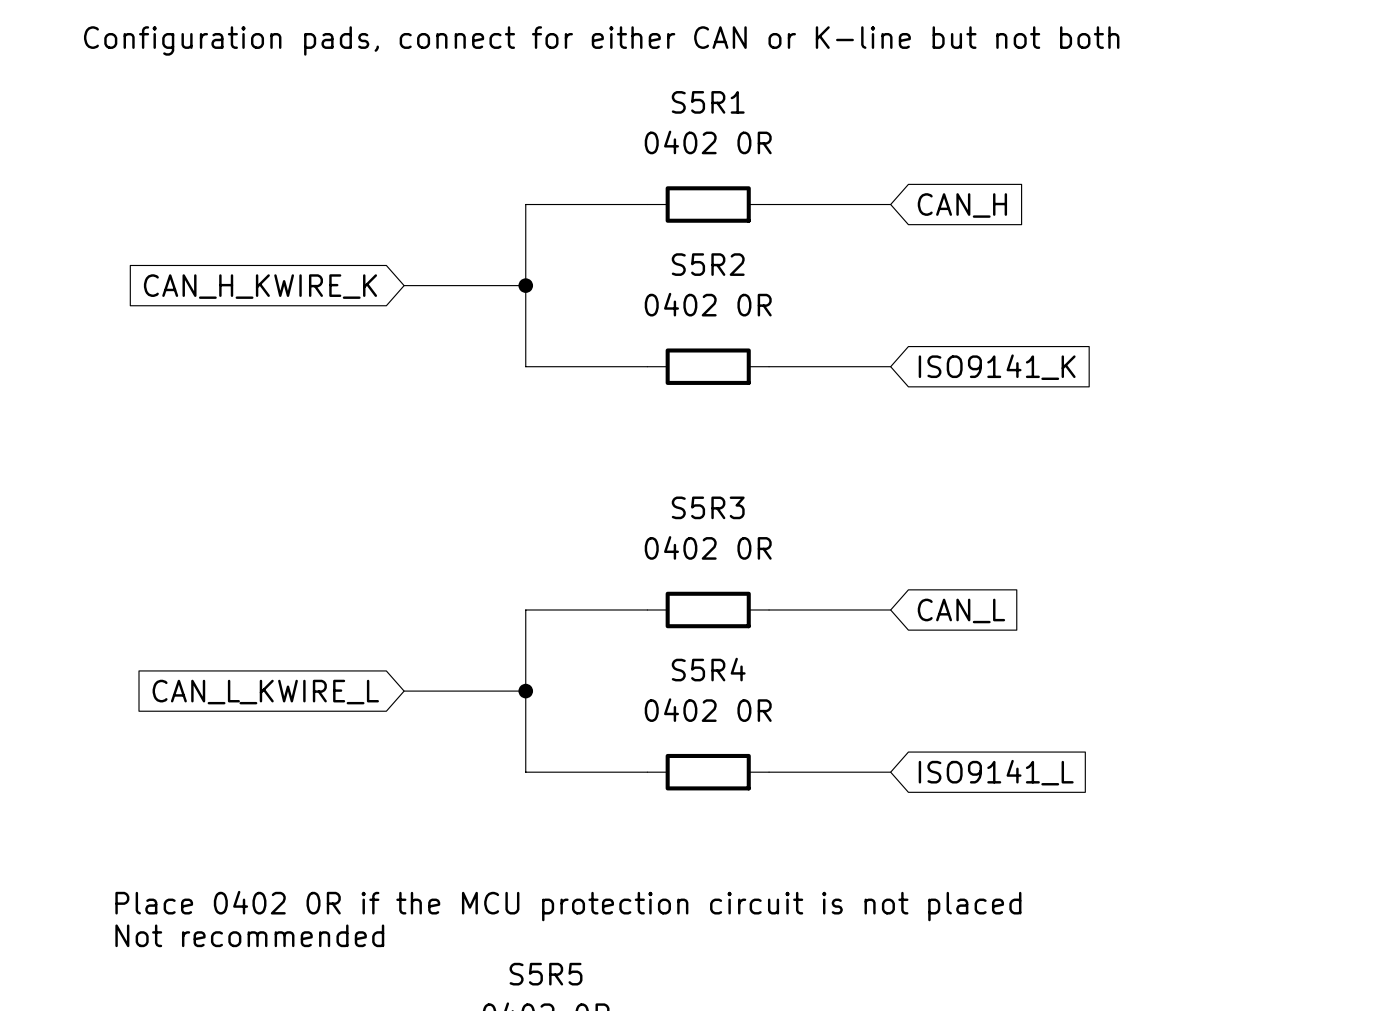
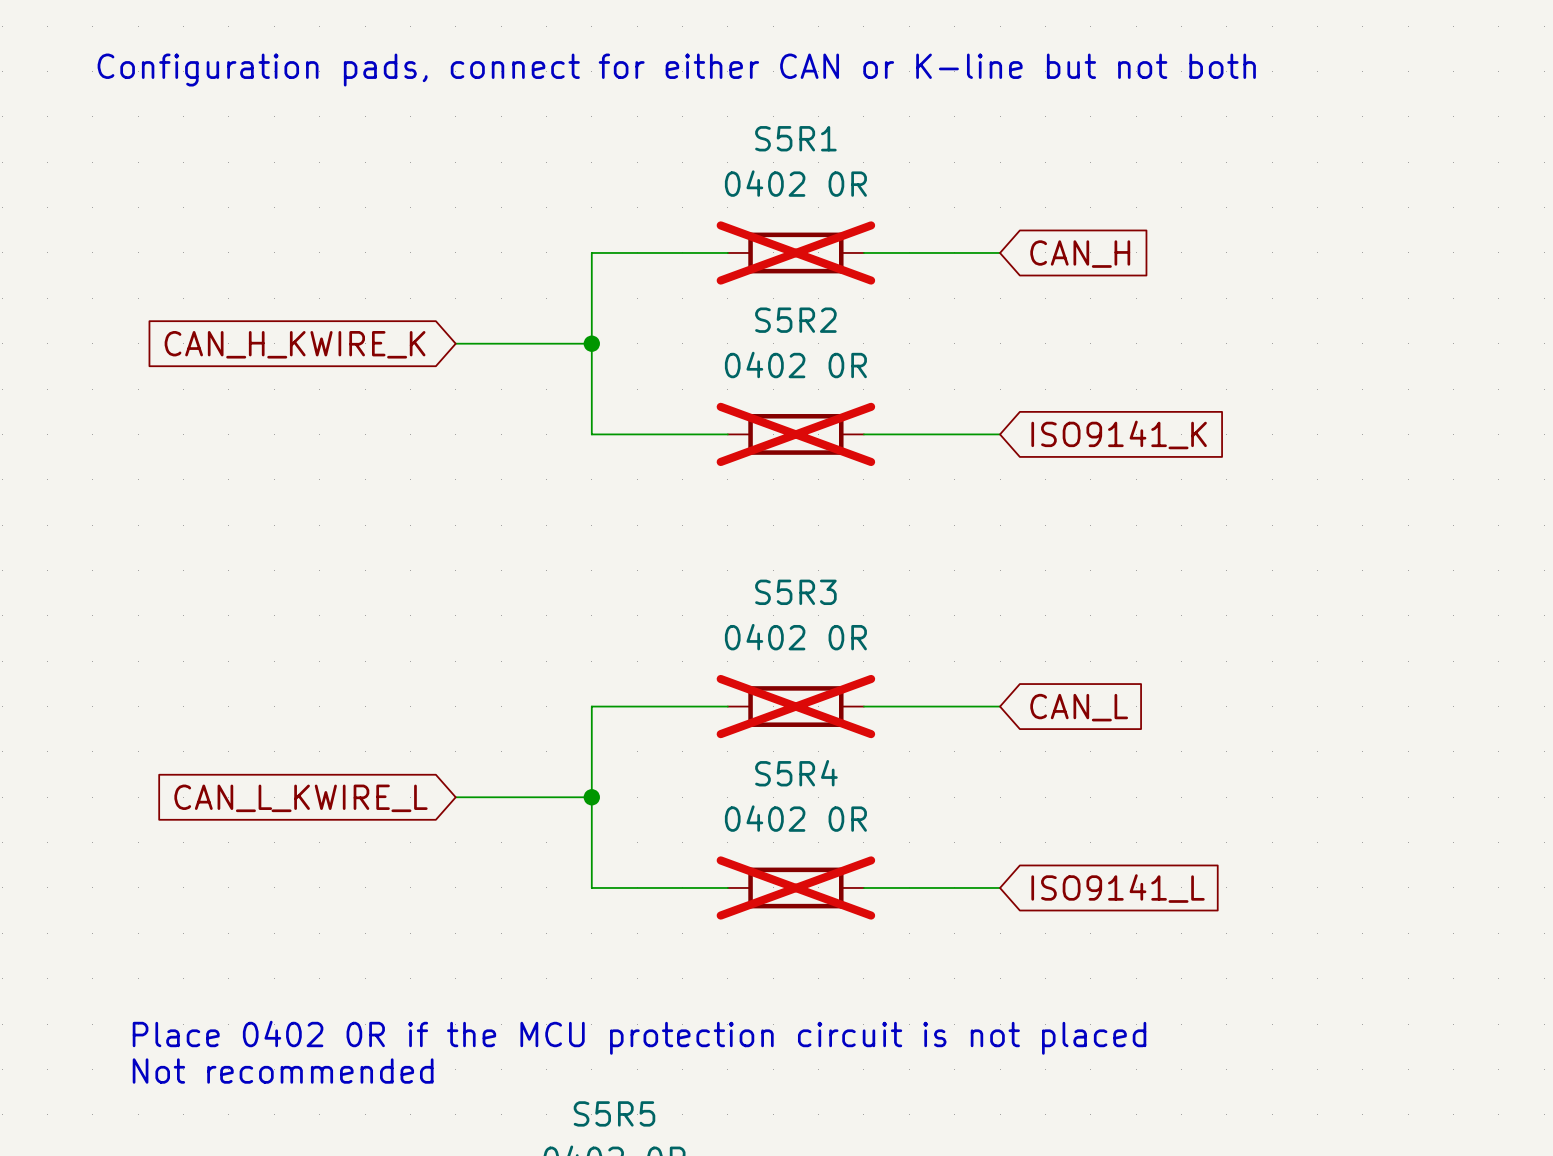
S5R1 do-not-place cross: none -> (795, 252)
S5R2 do-not-place cross: none -> (795, 434)
S5R3 do-not-place cross: none -> (795, 706)
S5R4 do-not-place cross: none -> (795, 887)

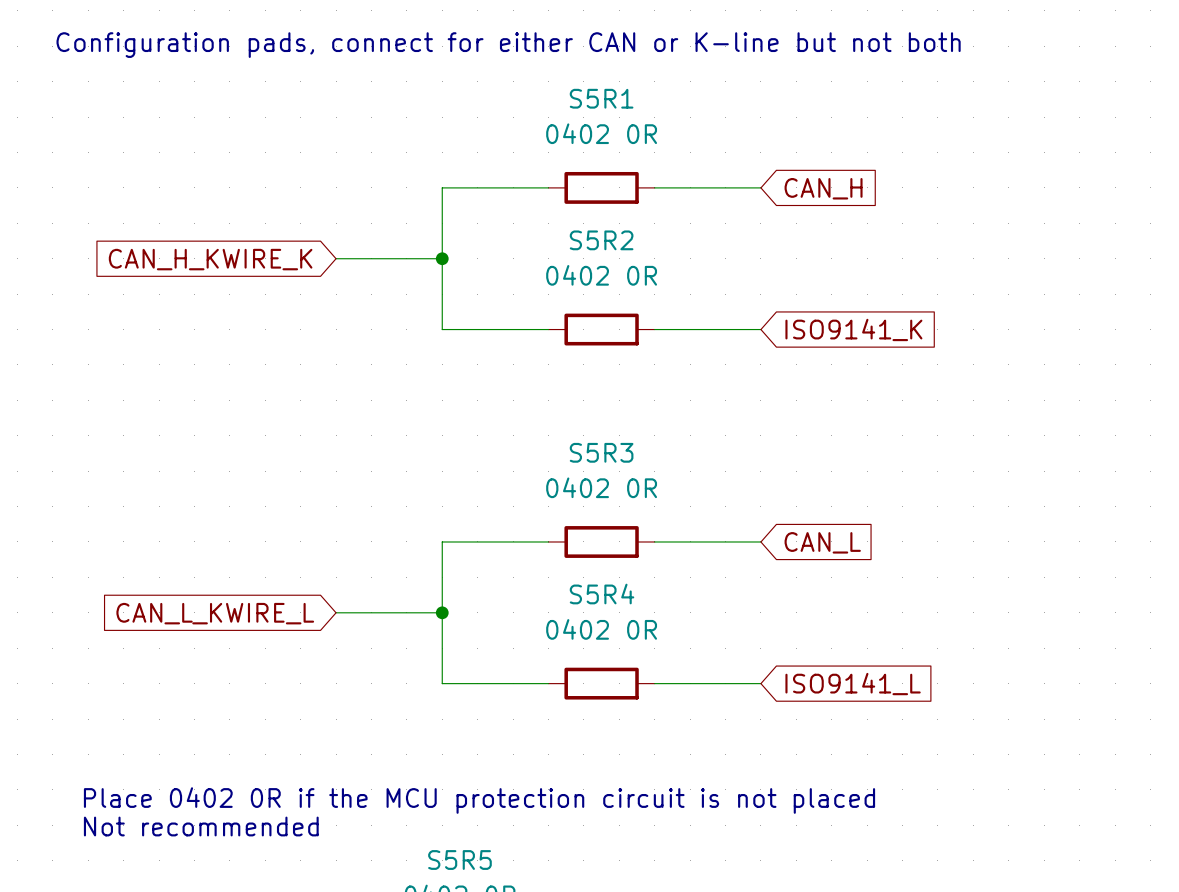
S5R1 do-not-place cross: (795, 252) -> none
S5R2 do-not-place cross: (795, 434) -> none
S5R3 do-not-place cross: (795, 706) -> none
S5R4 do-not-place cross: (795, 887) -> none

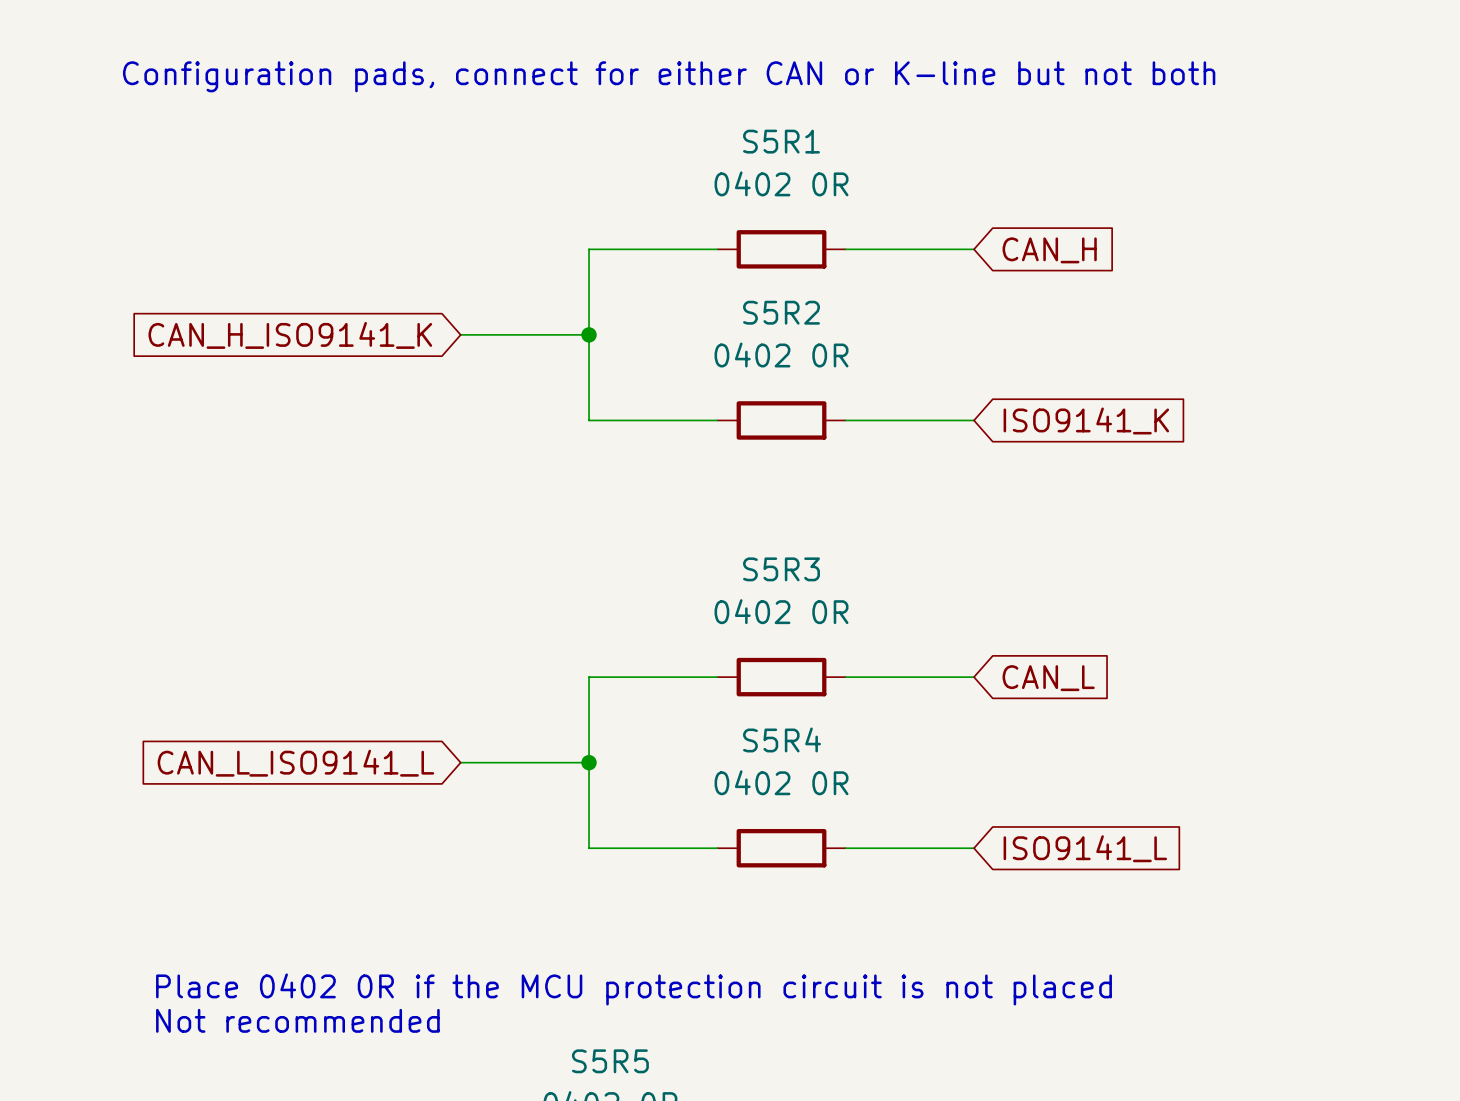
global label: CAN_H_KWIRE_K (210, 259) -> CAN_H_ISO9141_K (290, 335)
global label: CAN_L_KWIRE_L (215, 613) -> CAN_L_ISO9141_L (295, 763)

